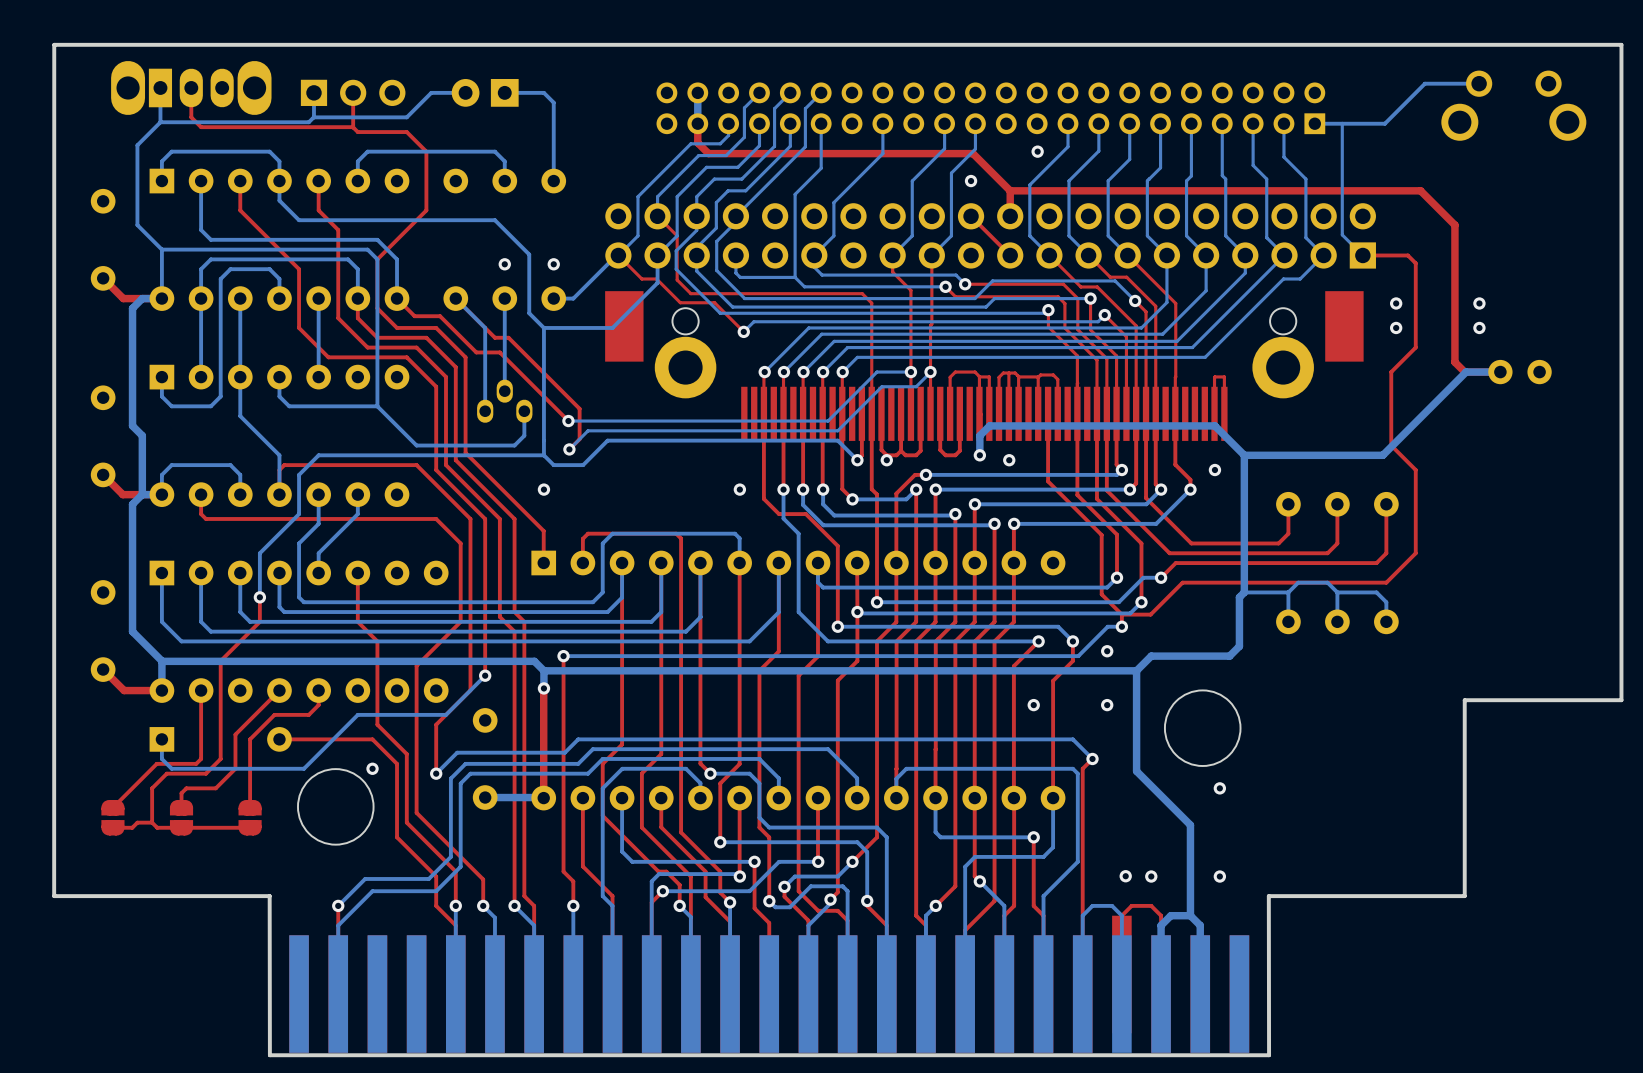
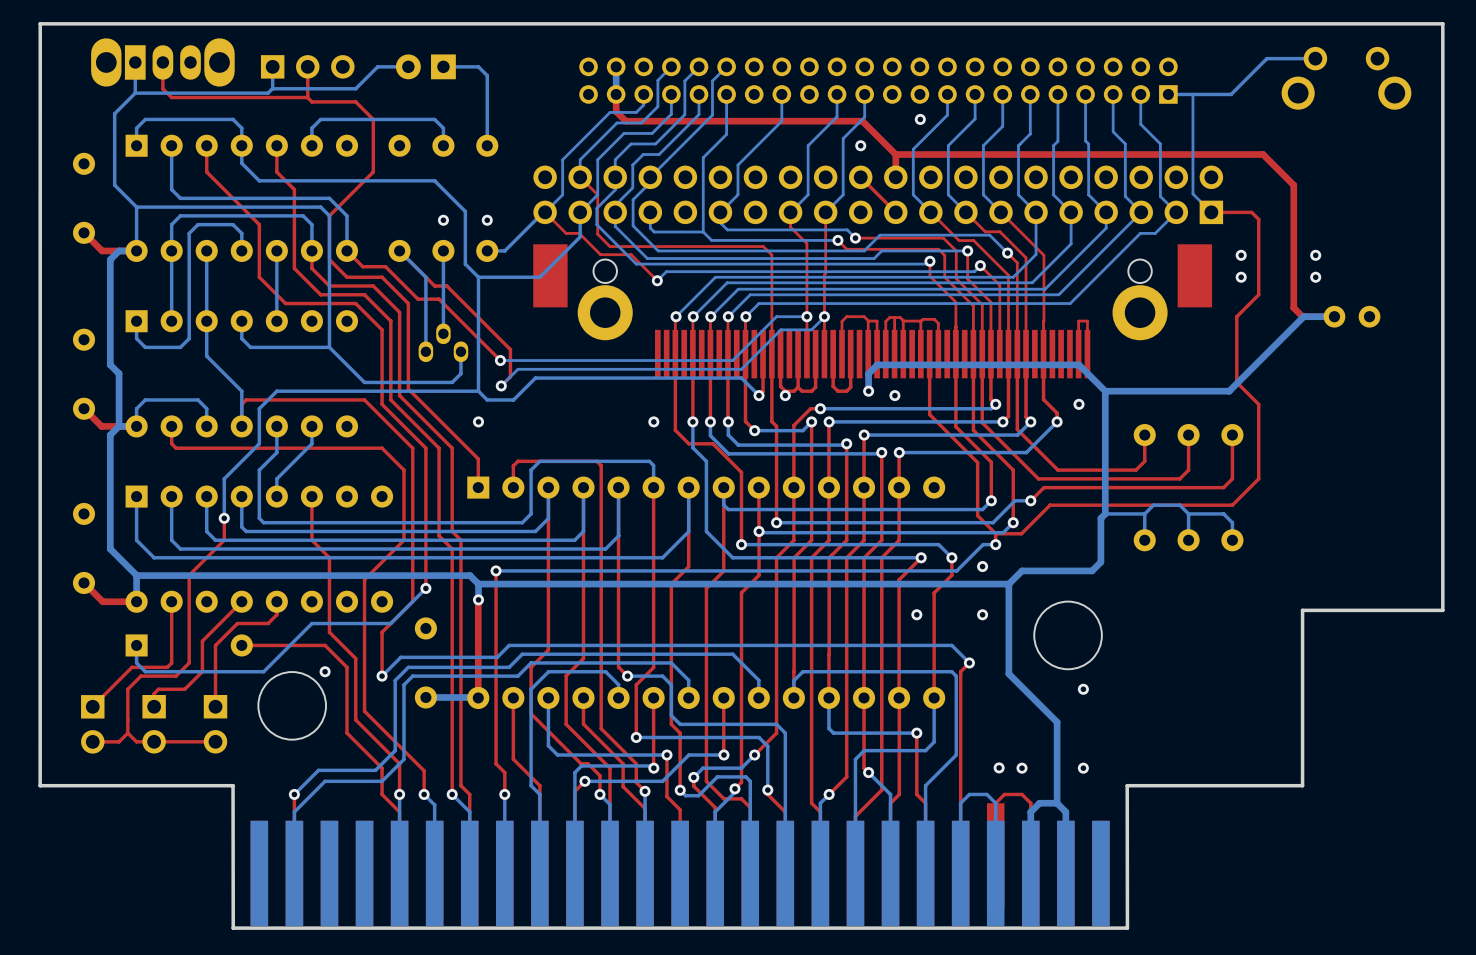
part footprint: [101, 800, 125, 836] -> [81, 695, 105, 754]
part footprint: [169, 800, 194, 836] -> [142, 695, 166, 754]
part footprint: [238, 800, 262, 836] -> [203, 695, 228, 754]
top track: none -> (127, 719) (127, 733)
top track: (250, 827) (157, 827) (152, 822) (137, 822) (132, 827) (112, 827) -> none
top track: none -> (127, 733) (119, 741) (92, 741)
top track: none -> (127, 733) (136, 741) (215, 741)

